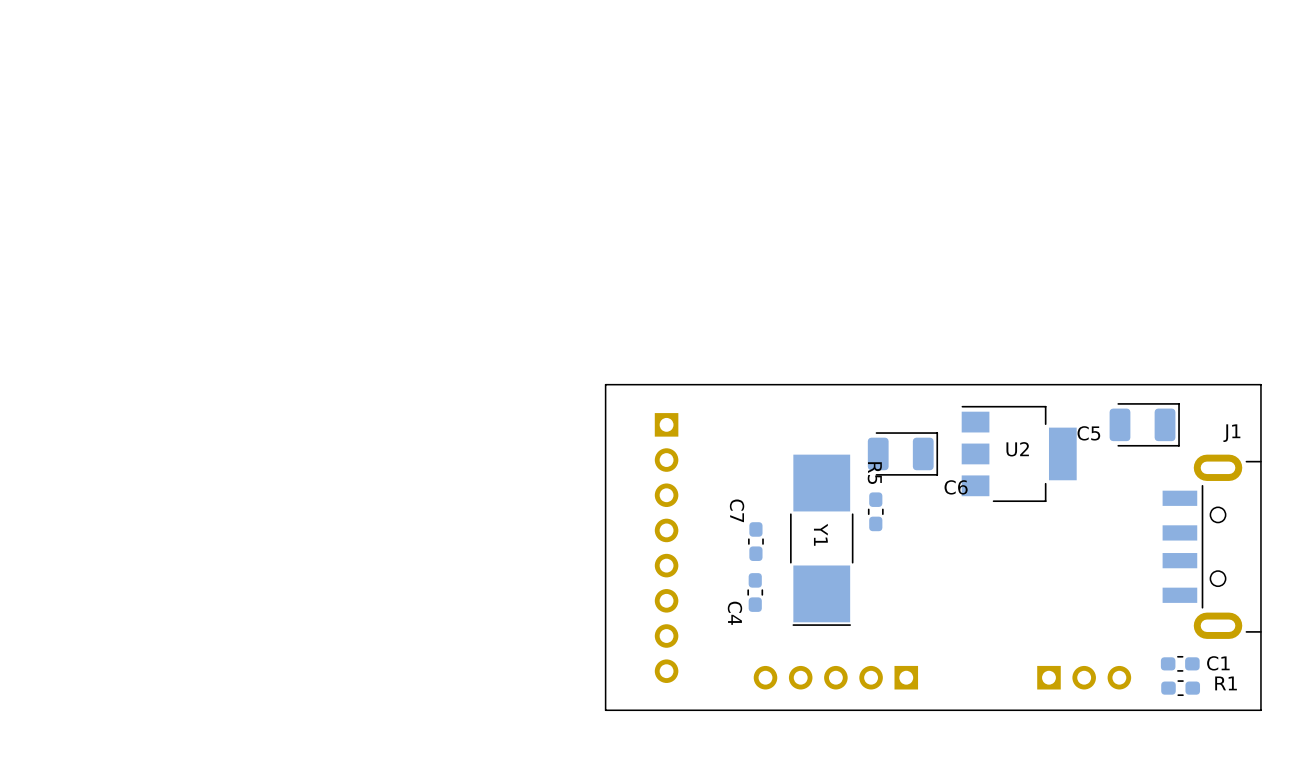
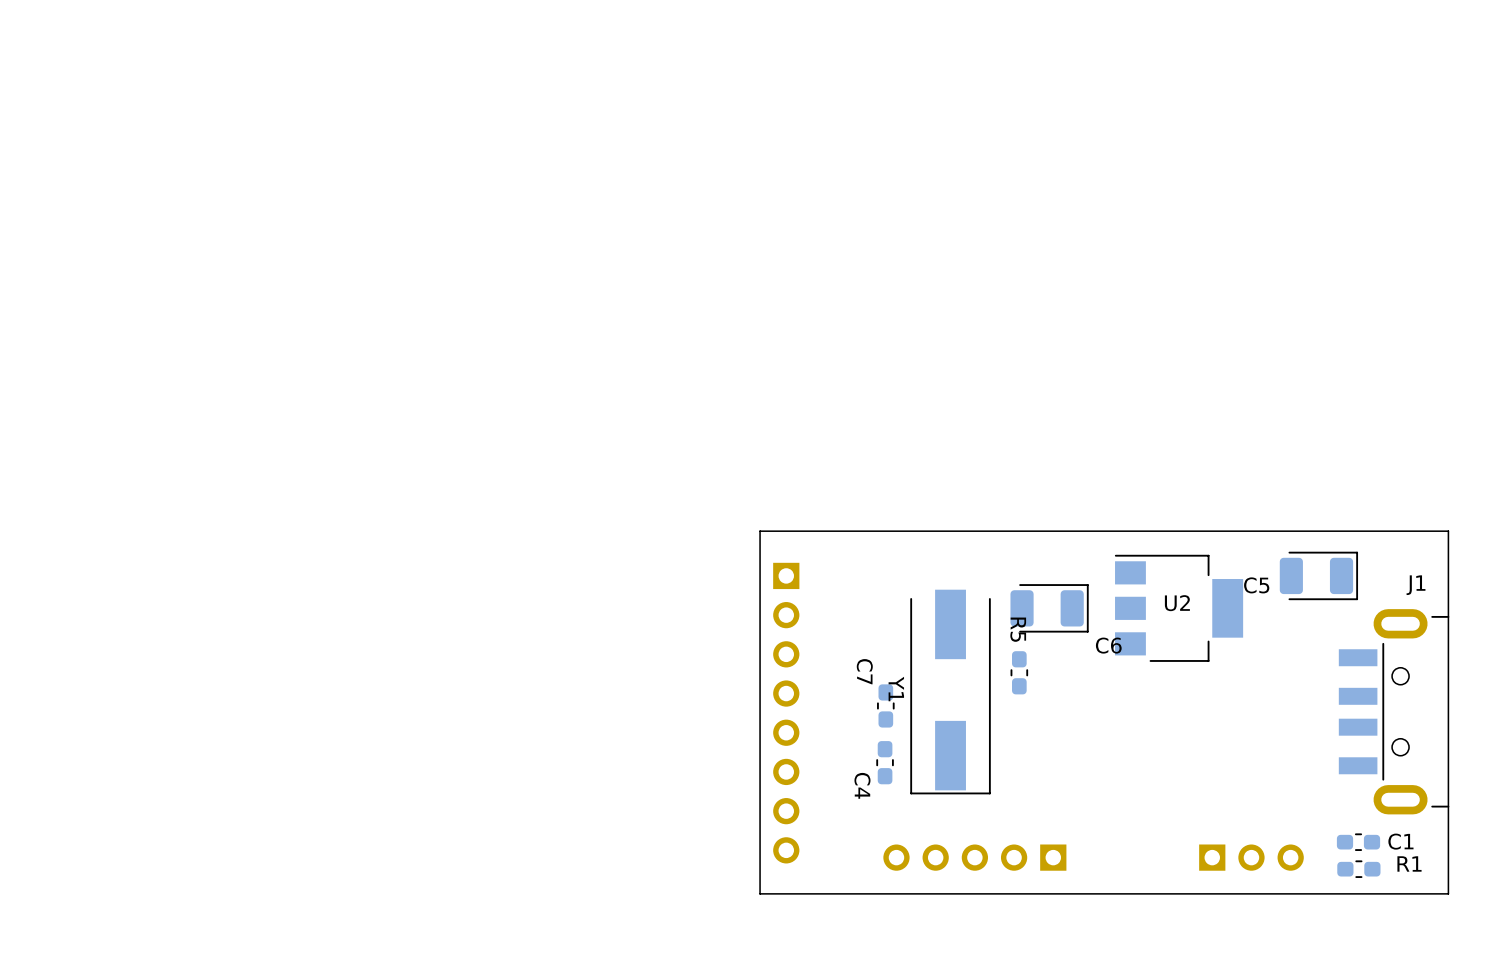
board edge: (643, 384) (605, 384) (605, 710) (643, 710) -> (760, 531) (760, 893)
Y1 footprint: [790, 454, 854, 626] -> [910, 589, 991, 795]
Y1 name position: Y1 (820, 534) -> Y1 (896, 689)

